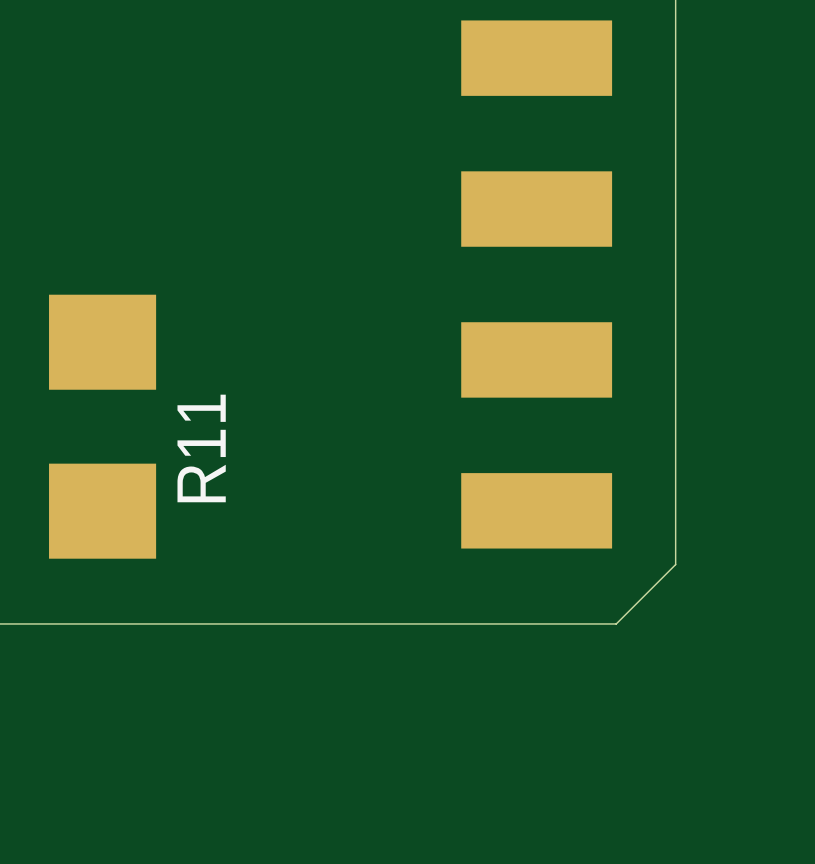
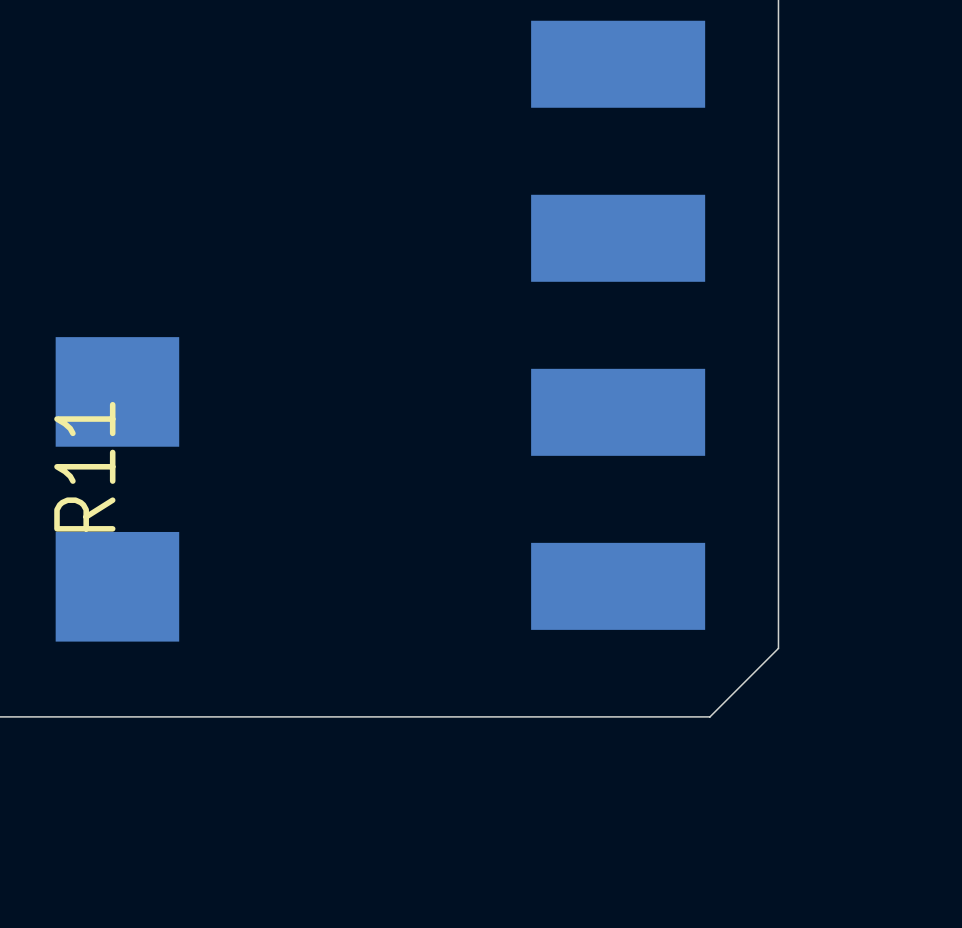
R11 name position: R11 (201, 448) -> R11 (84, 466)

